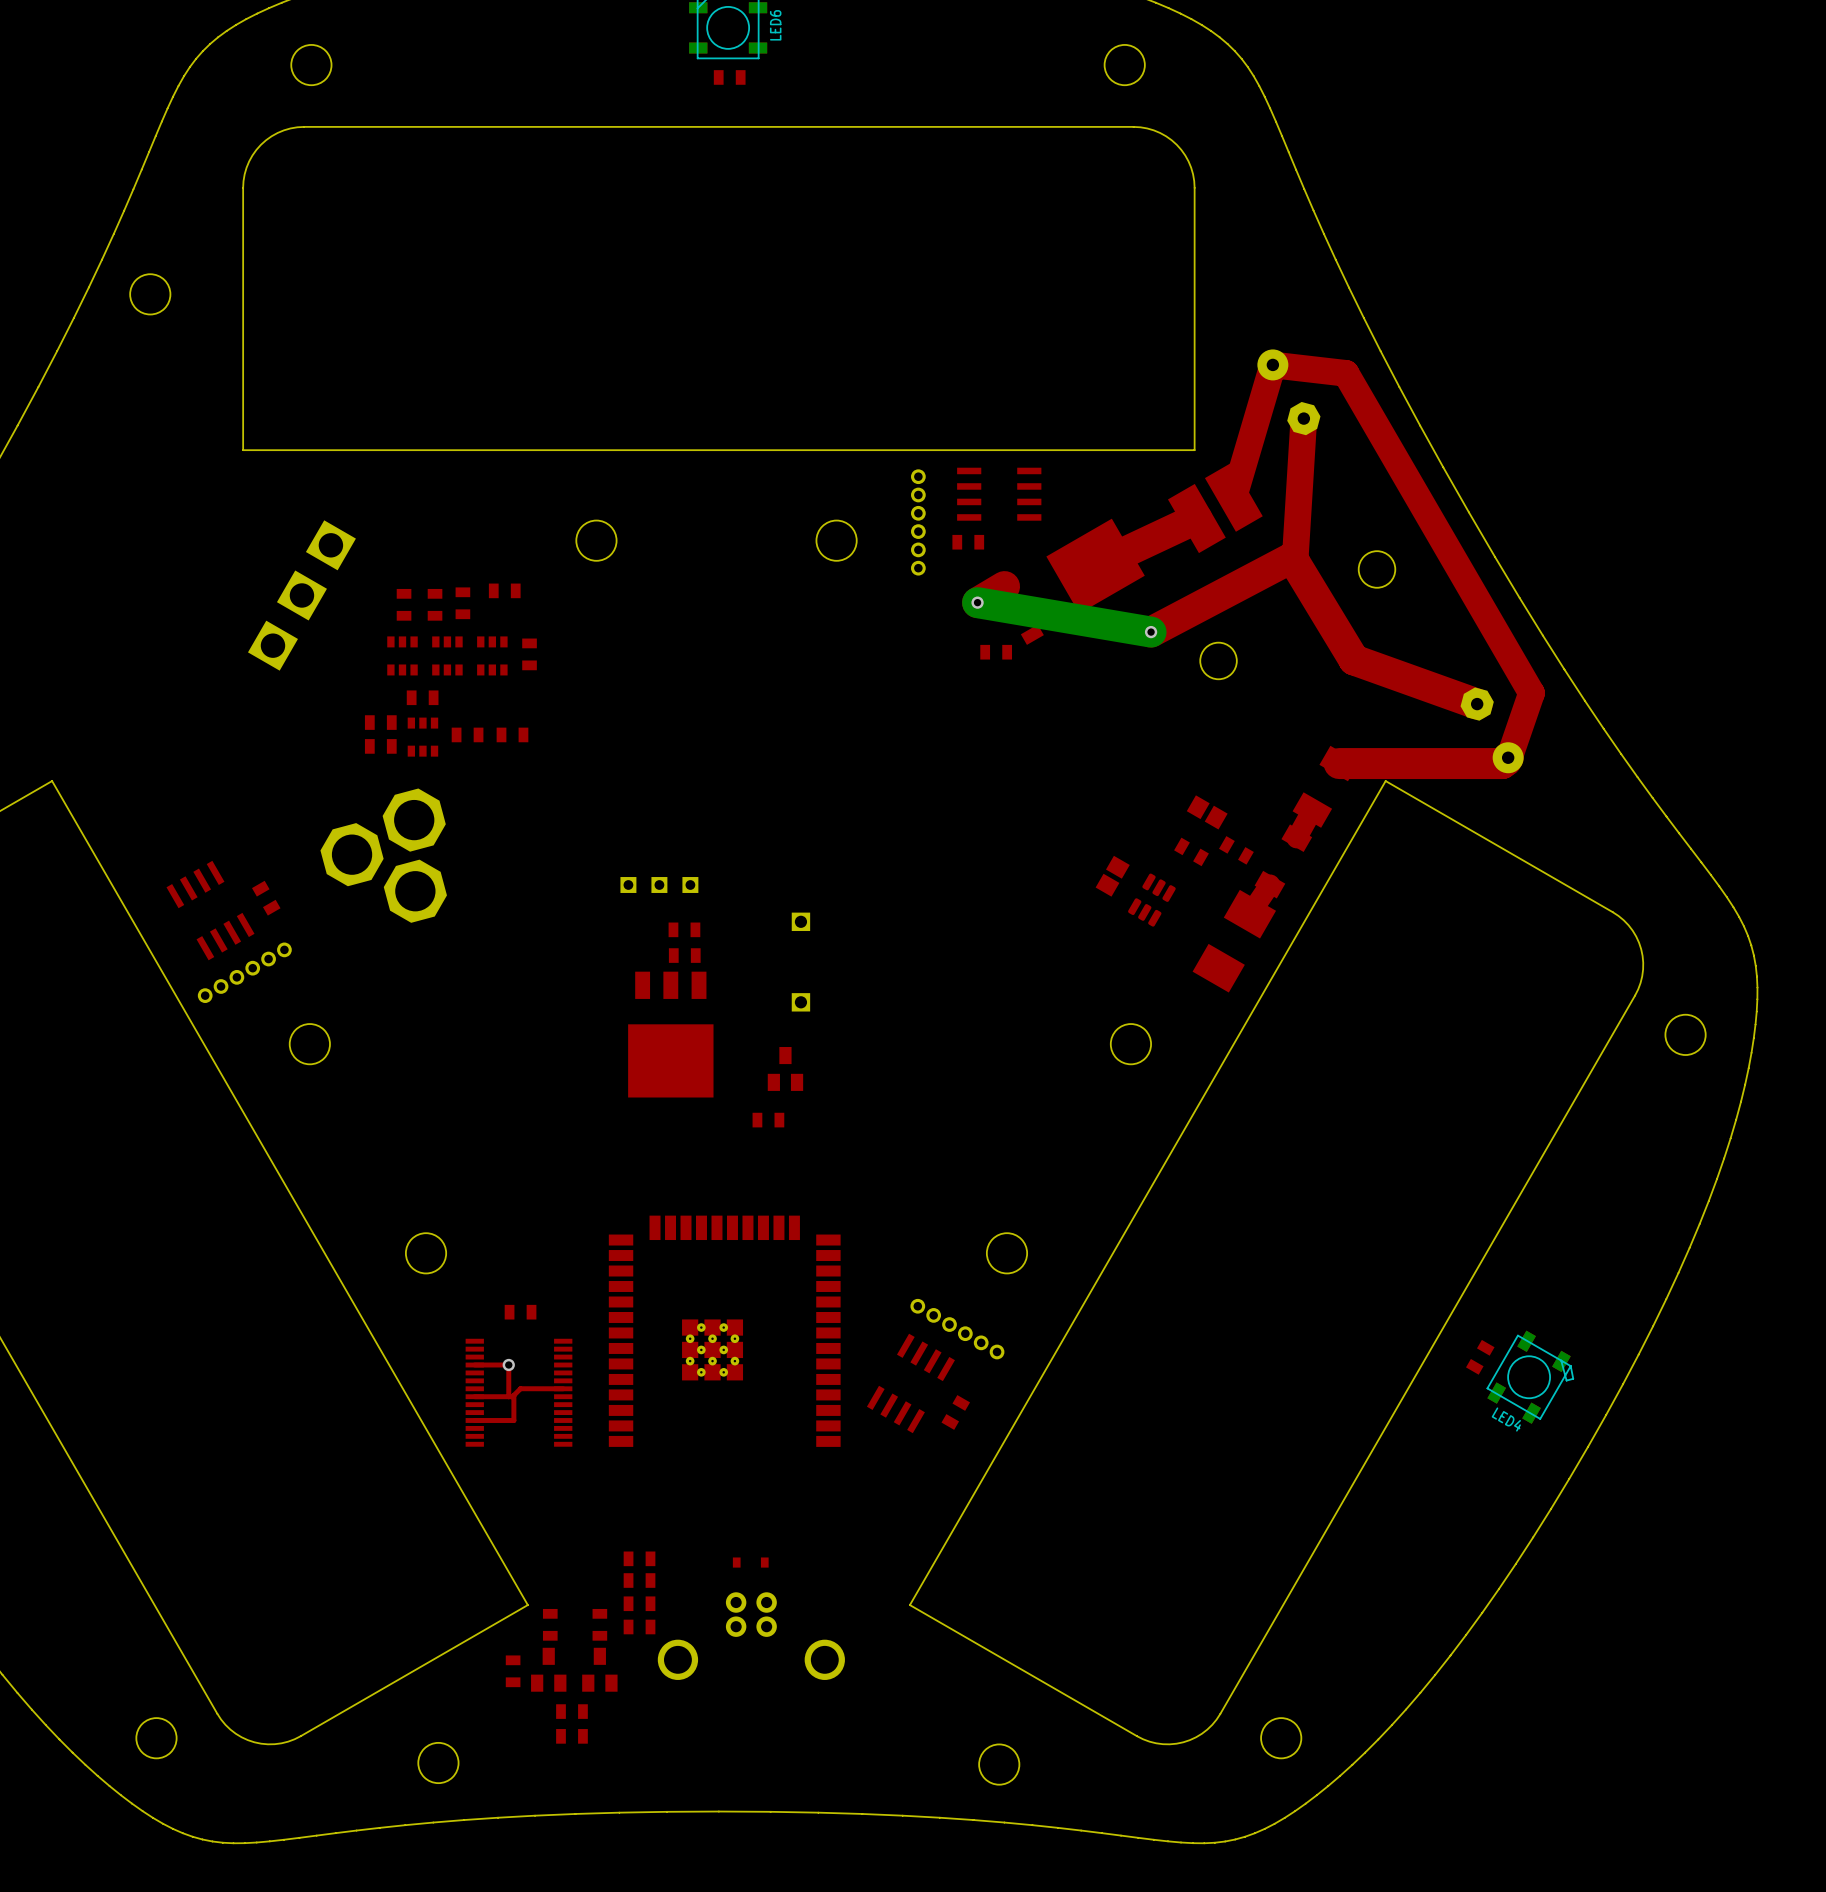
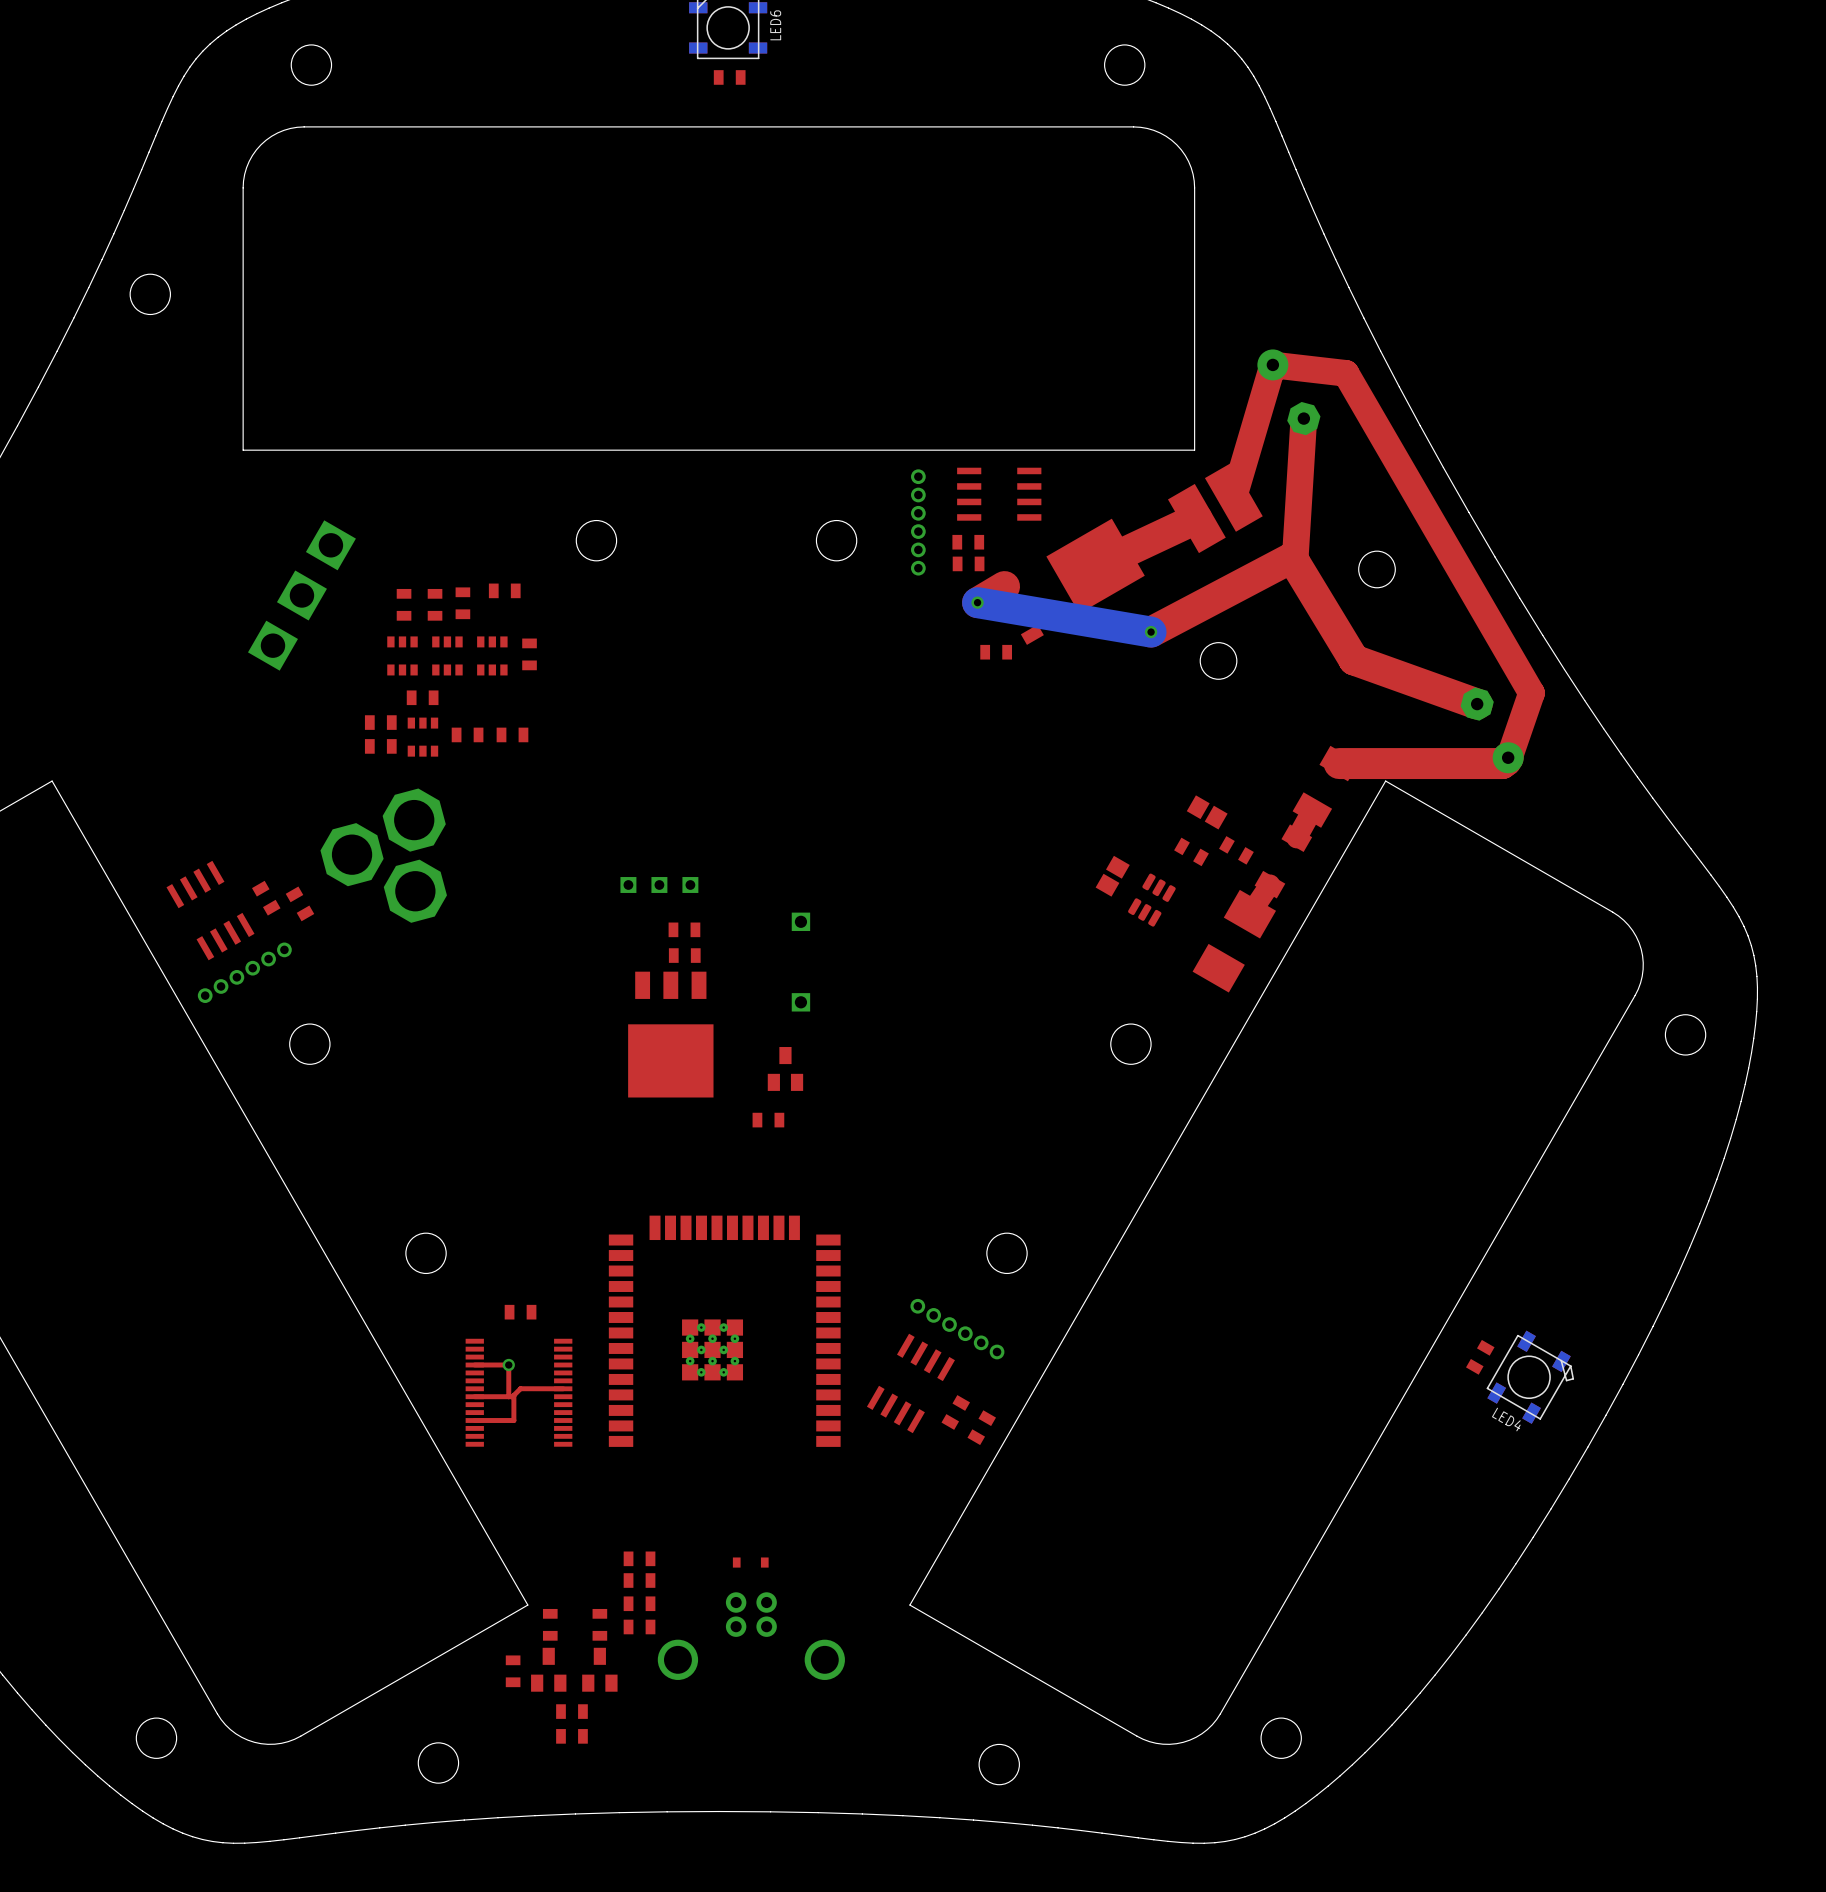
part: none -> (968, 563)
part: none -> (299, 903)
part: none -> (981, 1427)

